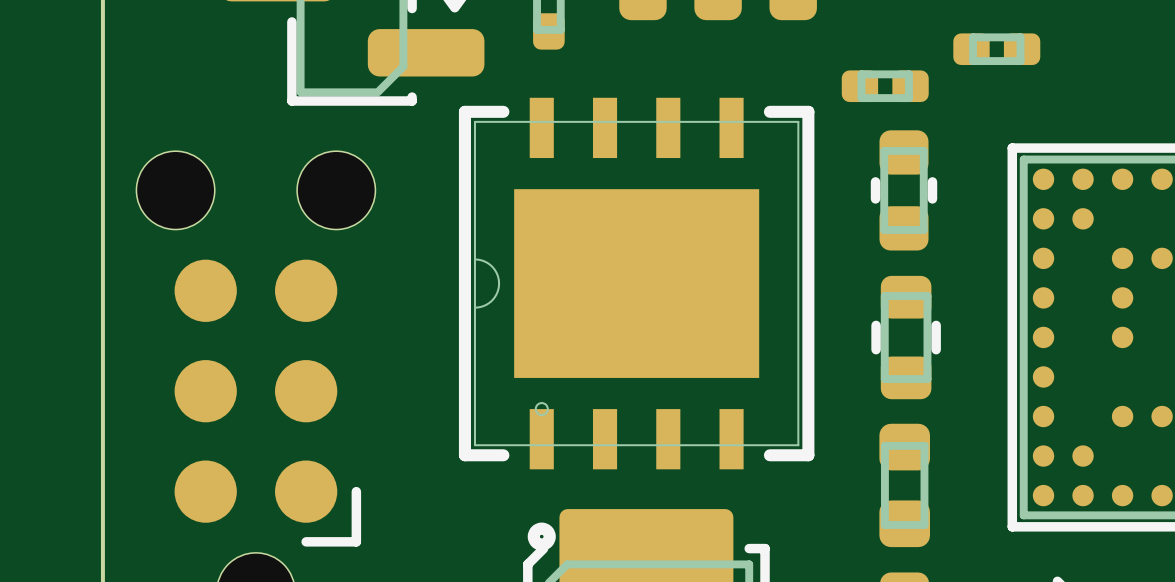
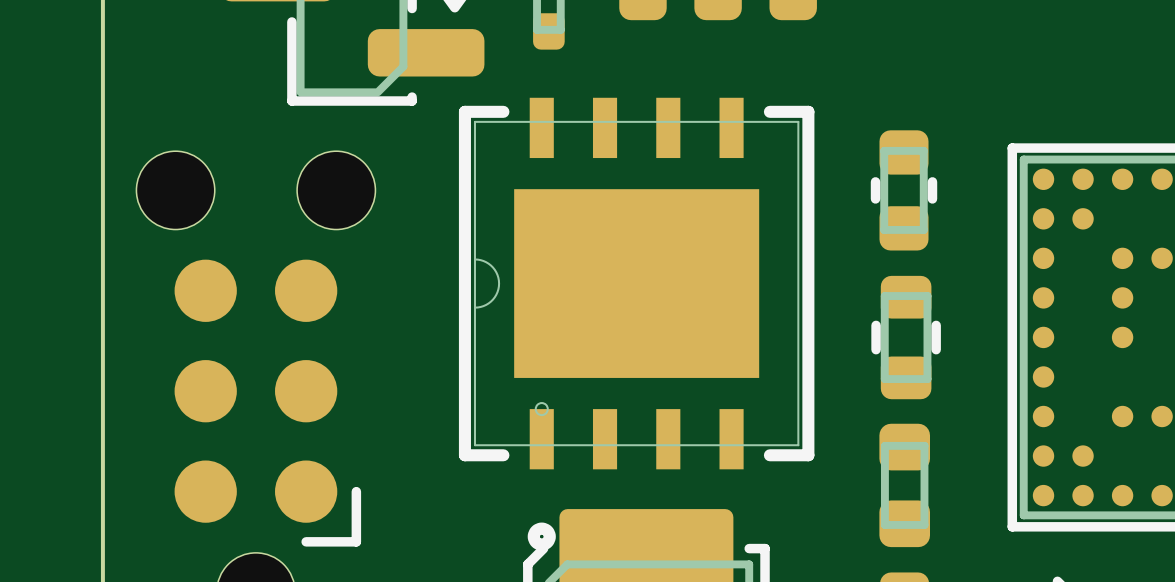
part: (996, 49) -> none
part: (885, 86) -> none

